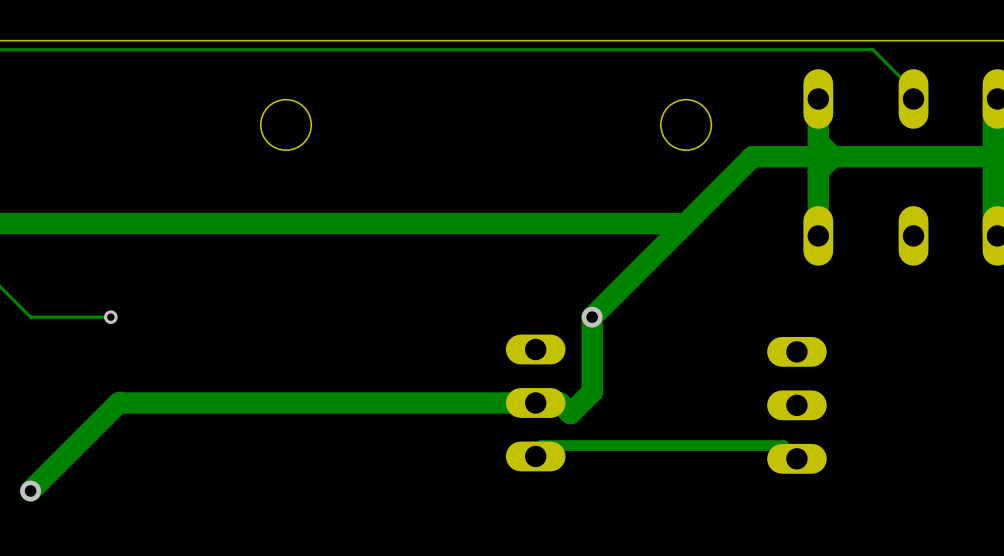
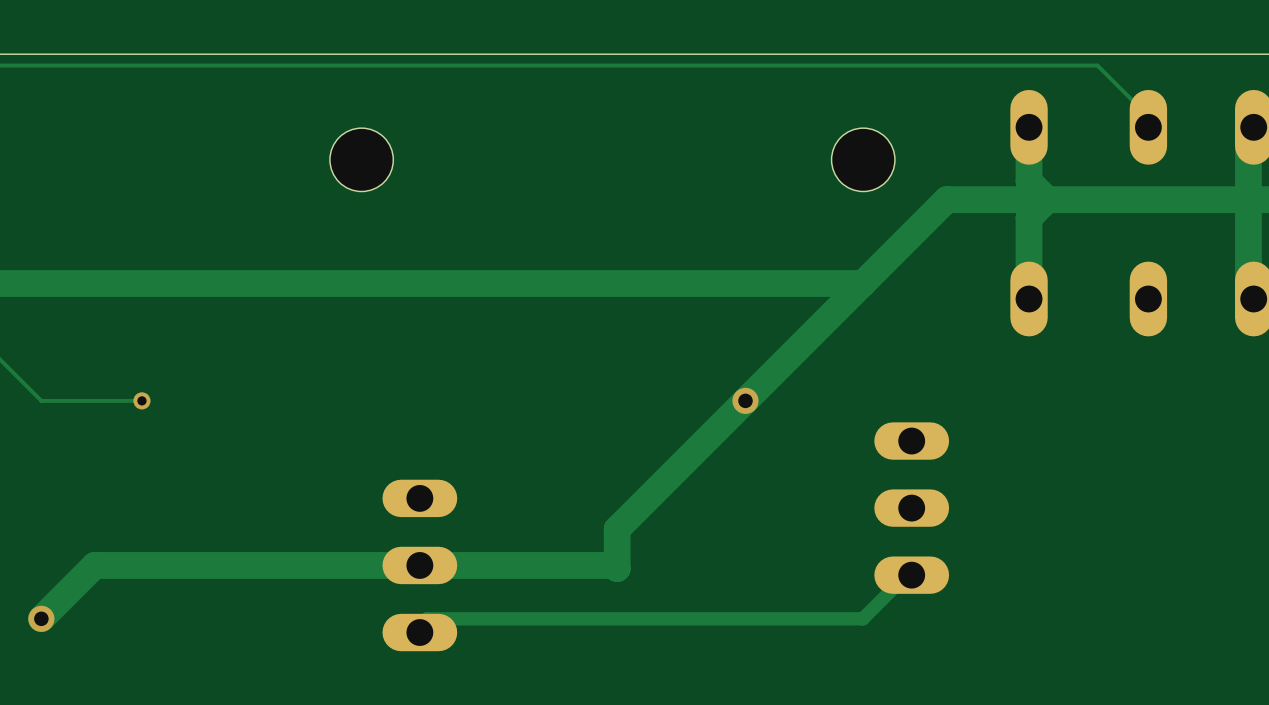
track: (592, 317) (592, 392) (570, 413) (559, 402) (118, 402) (73, 448) -> (745, 400) (617, 529) (617, 568) (614, 565) (94, 565)
part: (535, 402) -> none
part position: (796, 405) -> (911, 508)
part: none -> (419, 565)
track: (535, 456) (541, 445) (783, 445) (796, 458) -> none
track: none -> (911, 575) (896, 585) (862, 618) (426, 618) (419, 632)

